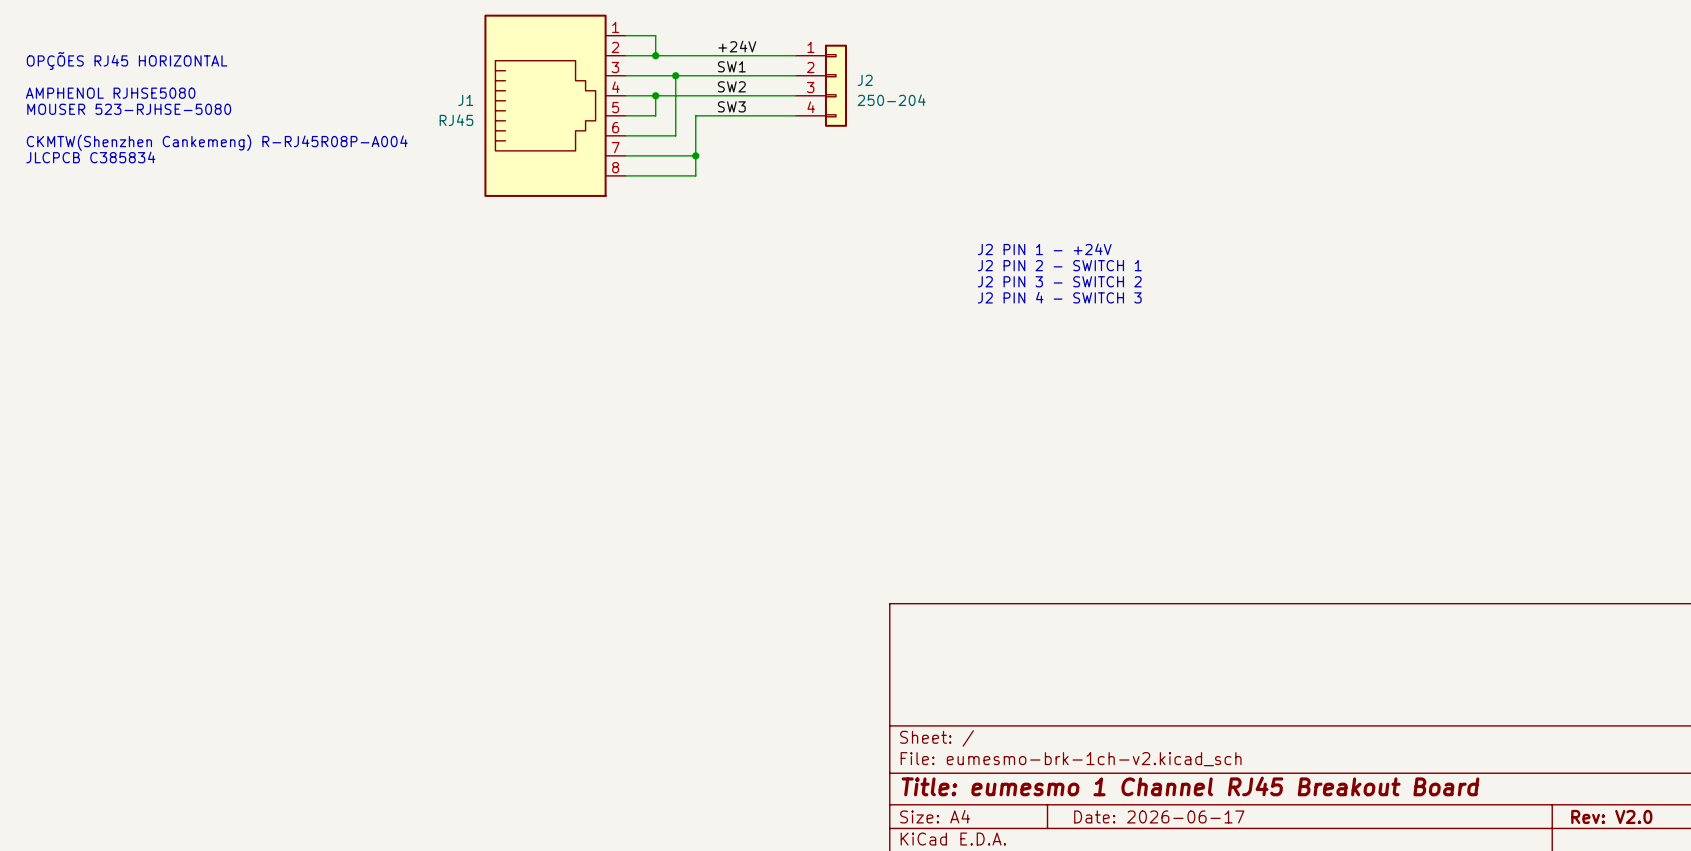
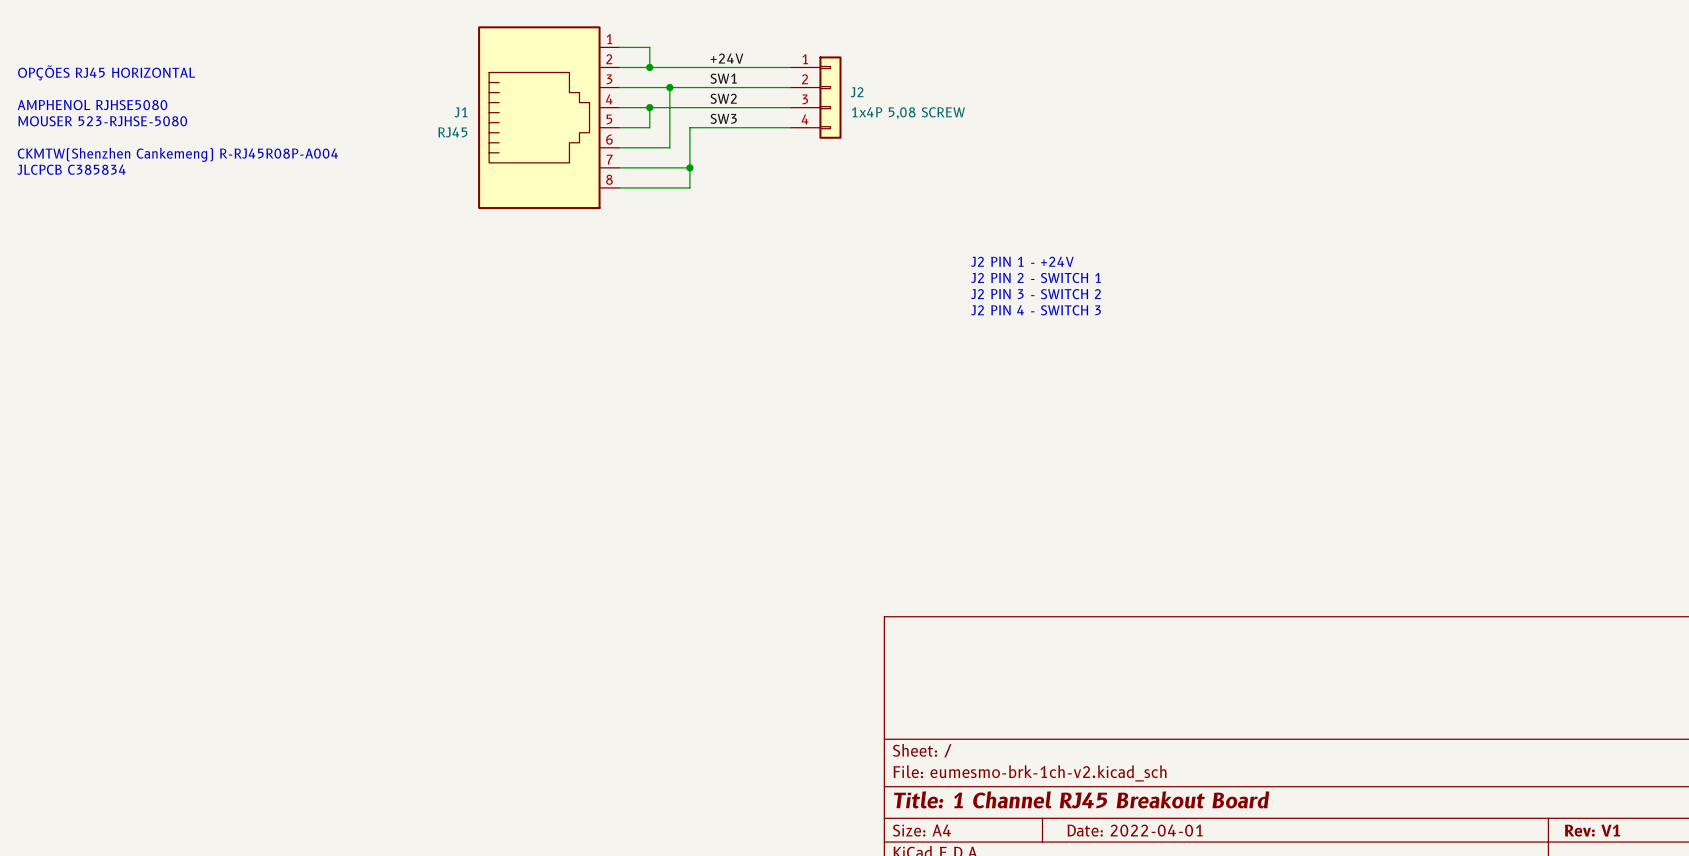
J2 value: 250-204 (891, 100) -> 1x4P 5,08 SCREW (908, 113)
title block: Title: eumesmo 1 Channel RJ45 Breakout Board (1190, 786) -> Title: 1 Channel RJ45 Breakout Board (1081, 799)
title block: Date: 2026-06-17 (1159, 816) -> Date: 2022-04-01 (1135, 830)
title block: Rev: V2.0 (1611, 816) -> Rev: V1 (1592, 830)

